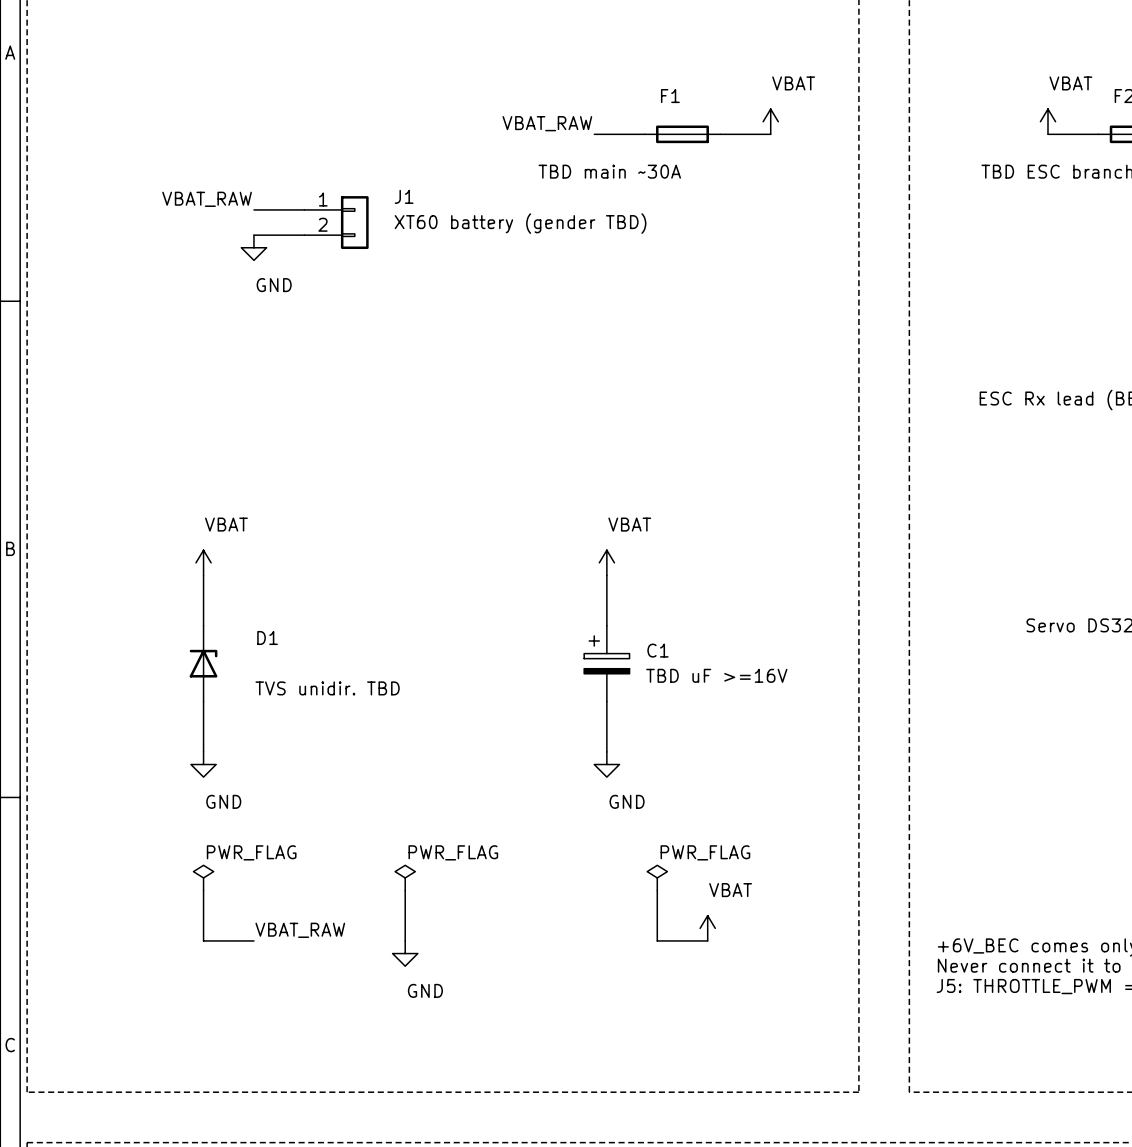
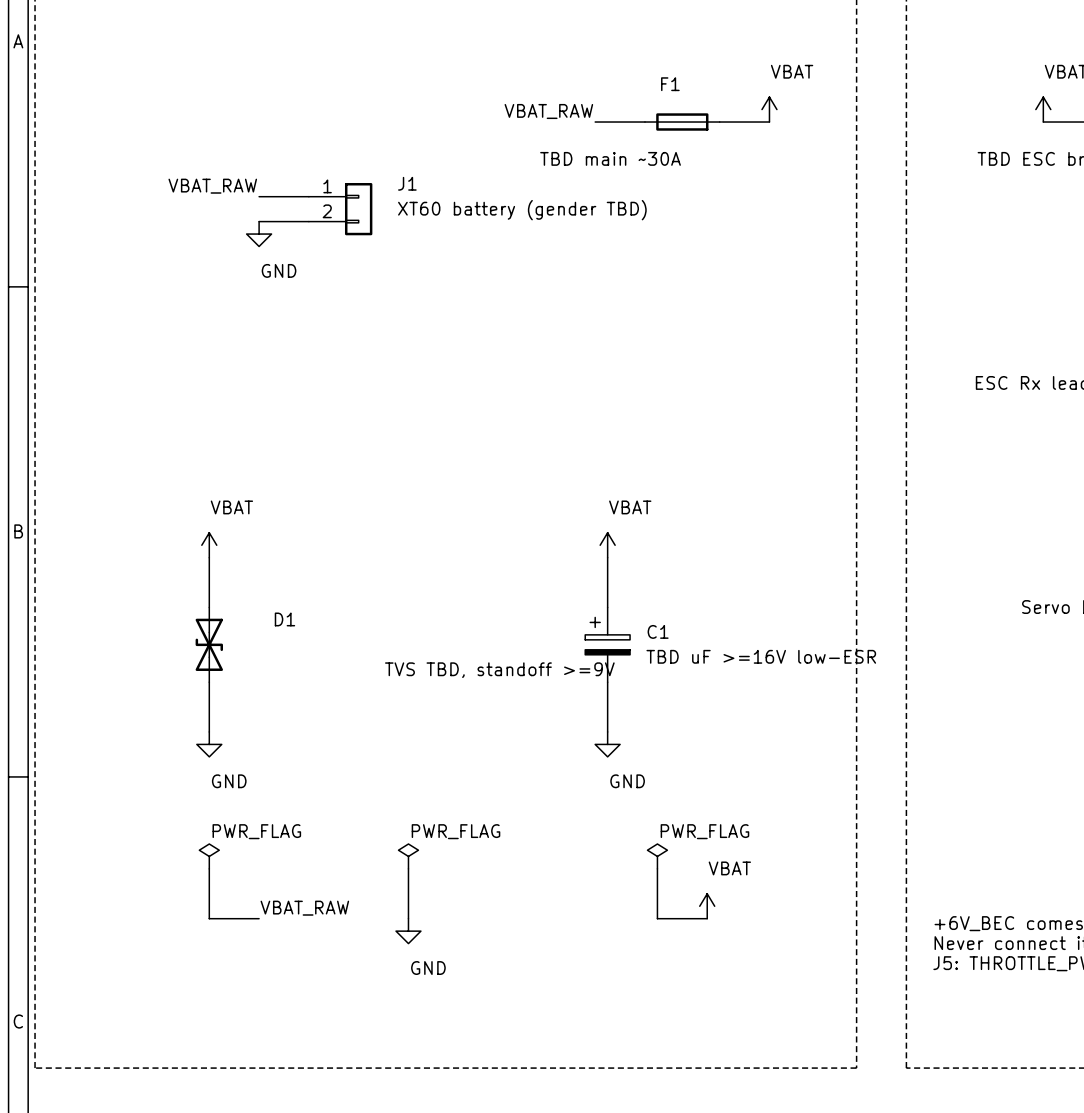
D1 symbol: [189, 625, 218, 702] -> [195, 607, 223, 683]
C1 value: TBD uF >=16V (716, 675) -> TBD uF >=16V low-ESR (761, 656)
D1 value: TVS unidir. TBD (327, 688) -> TVS TBD, standoff >=9V (499, 670)

